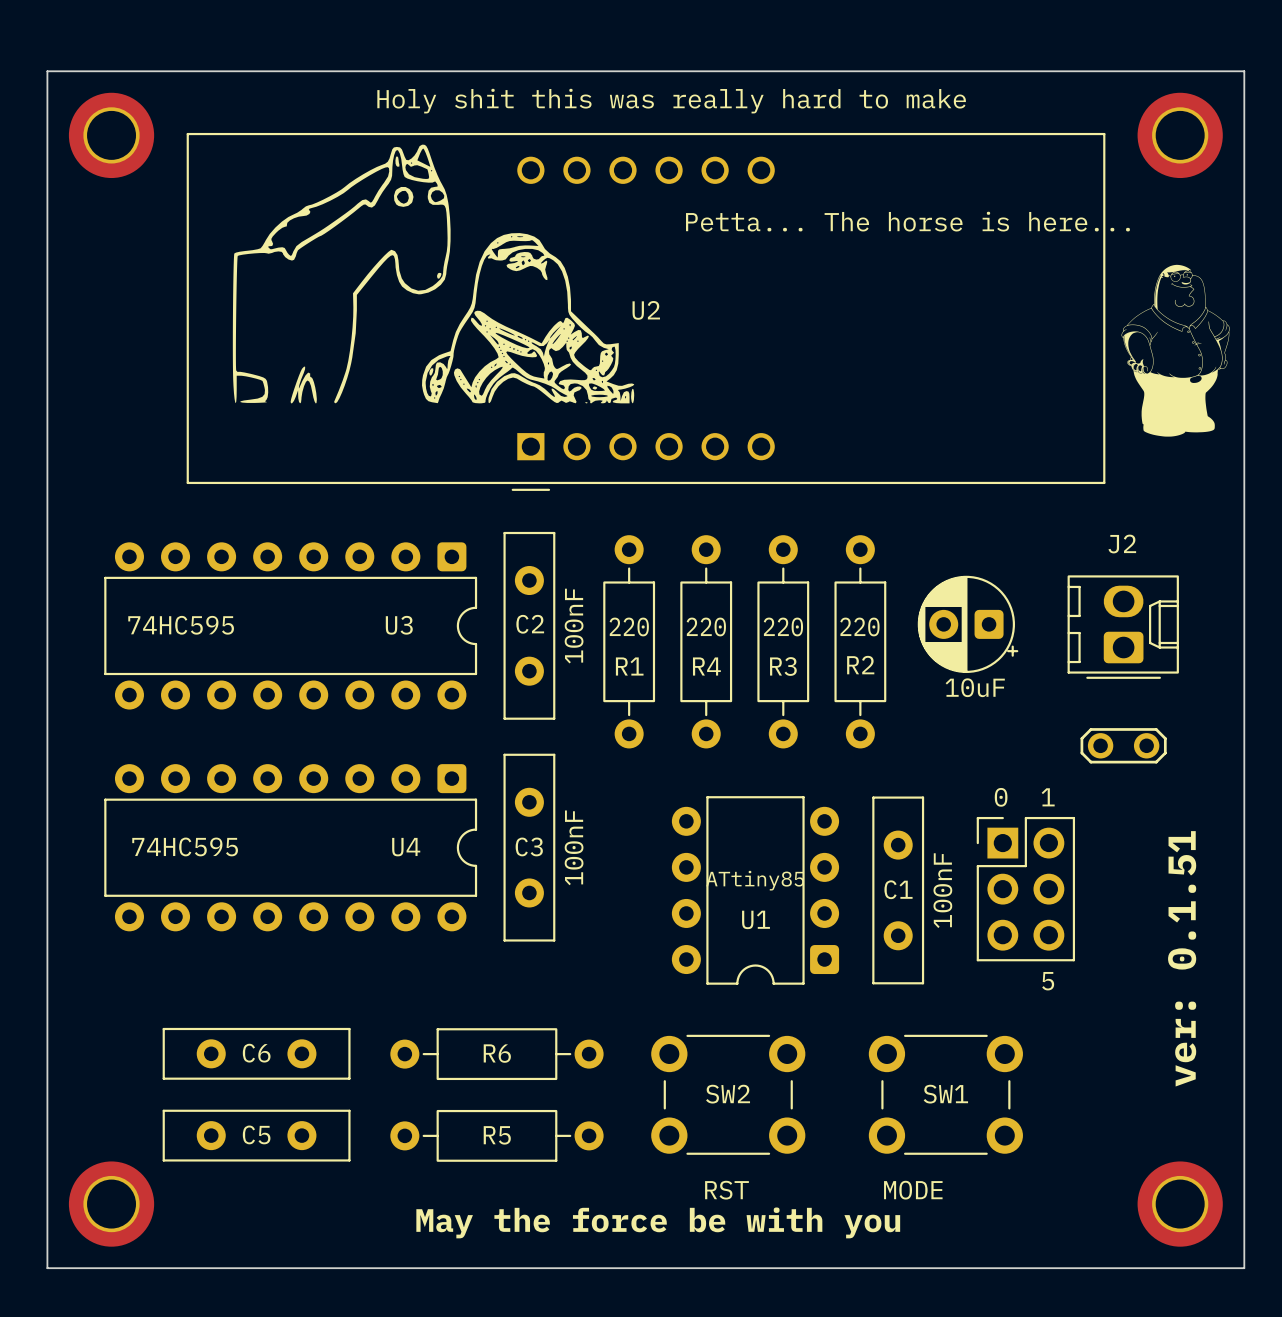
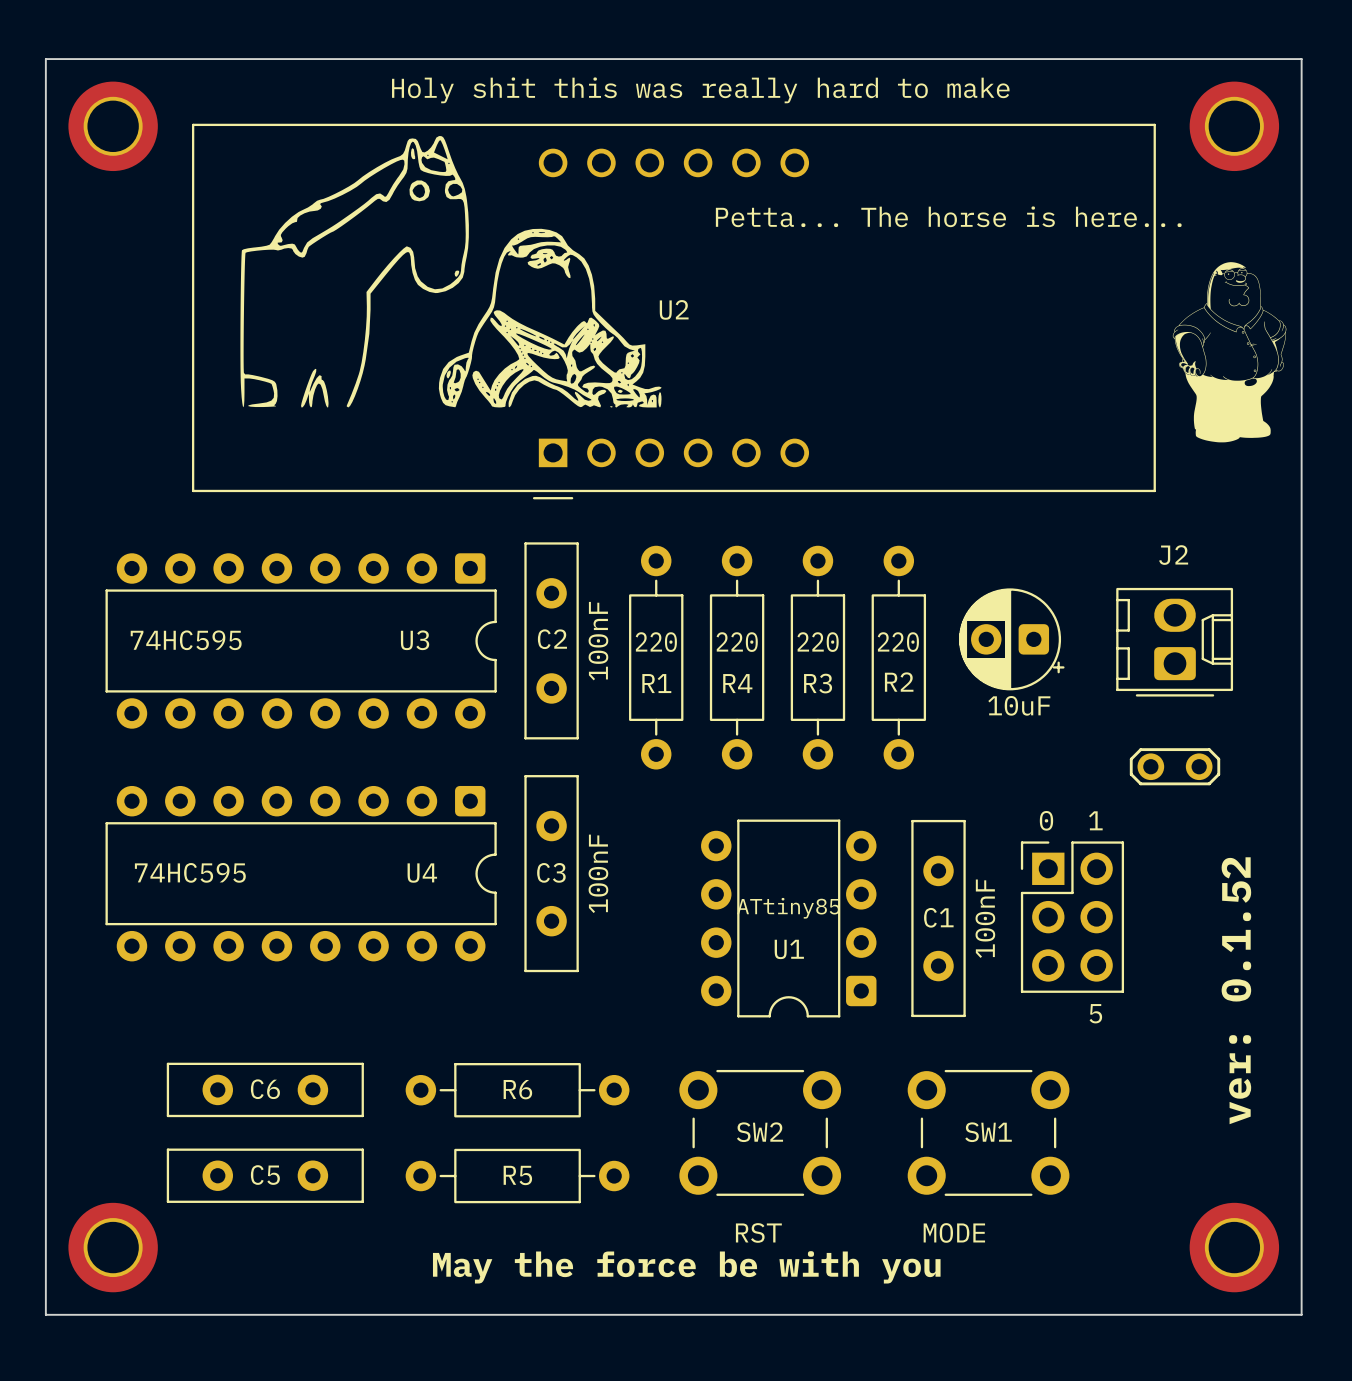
text: ver: 0.1.51 (1182, 958) -> ver: 0.1.52 (1236, 990)

